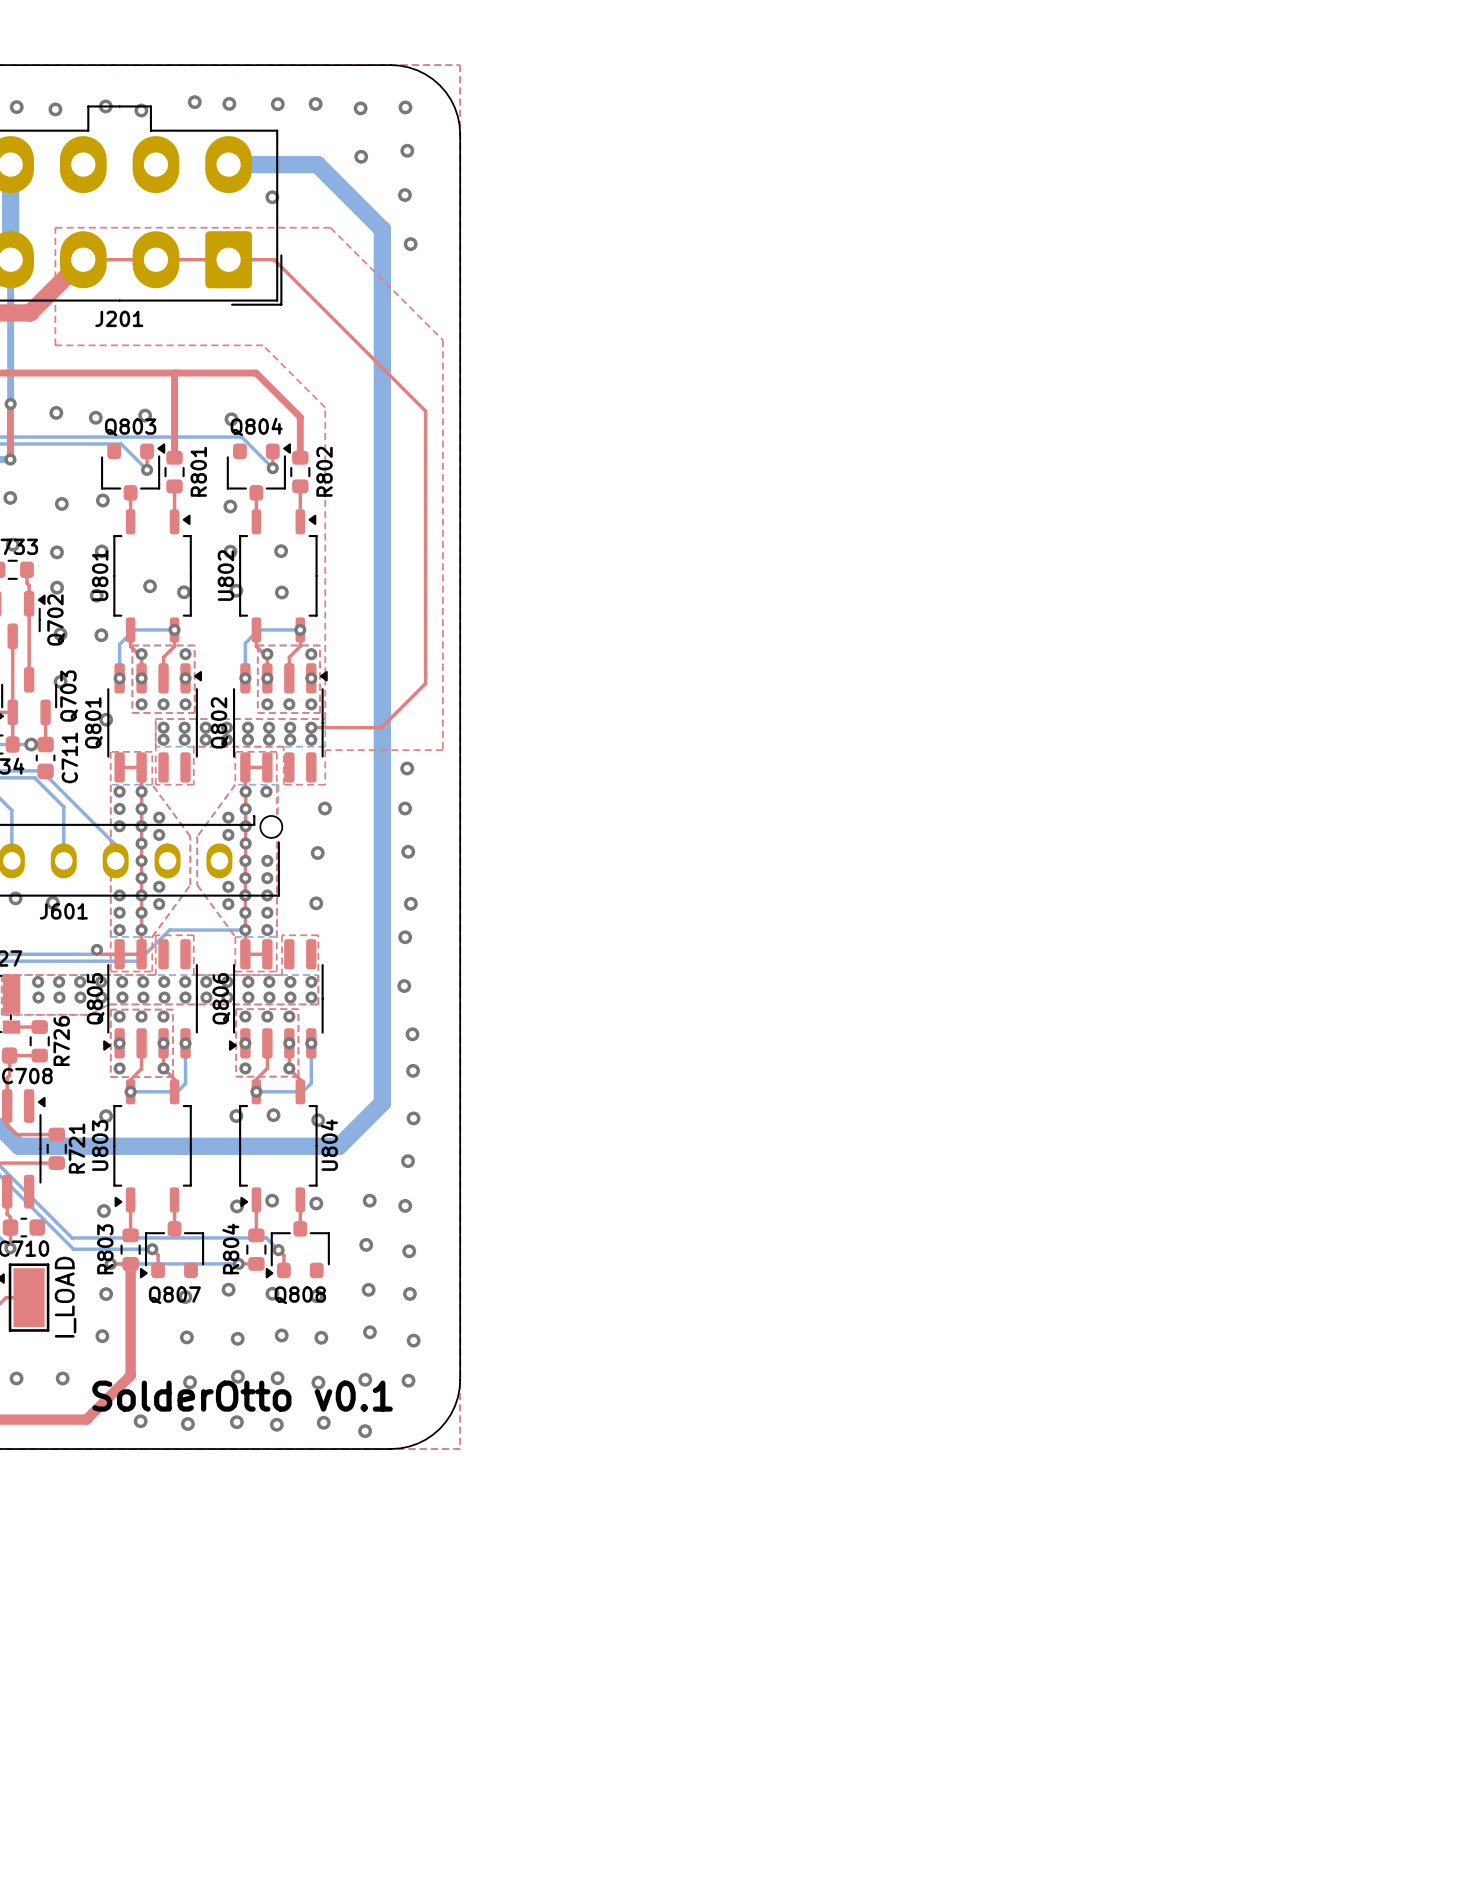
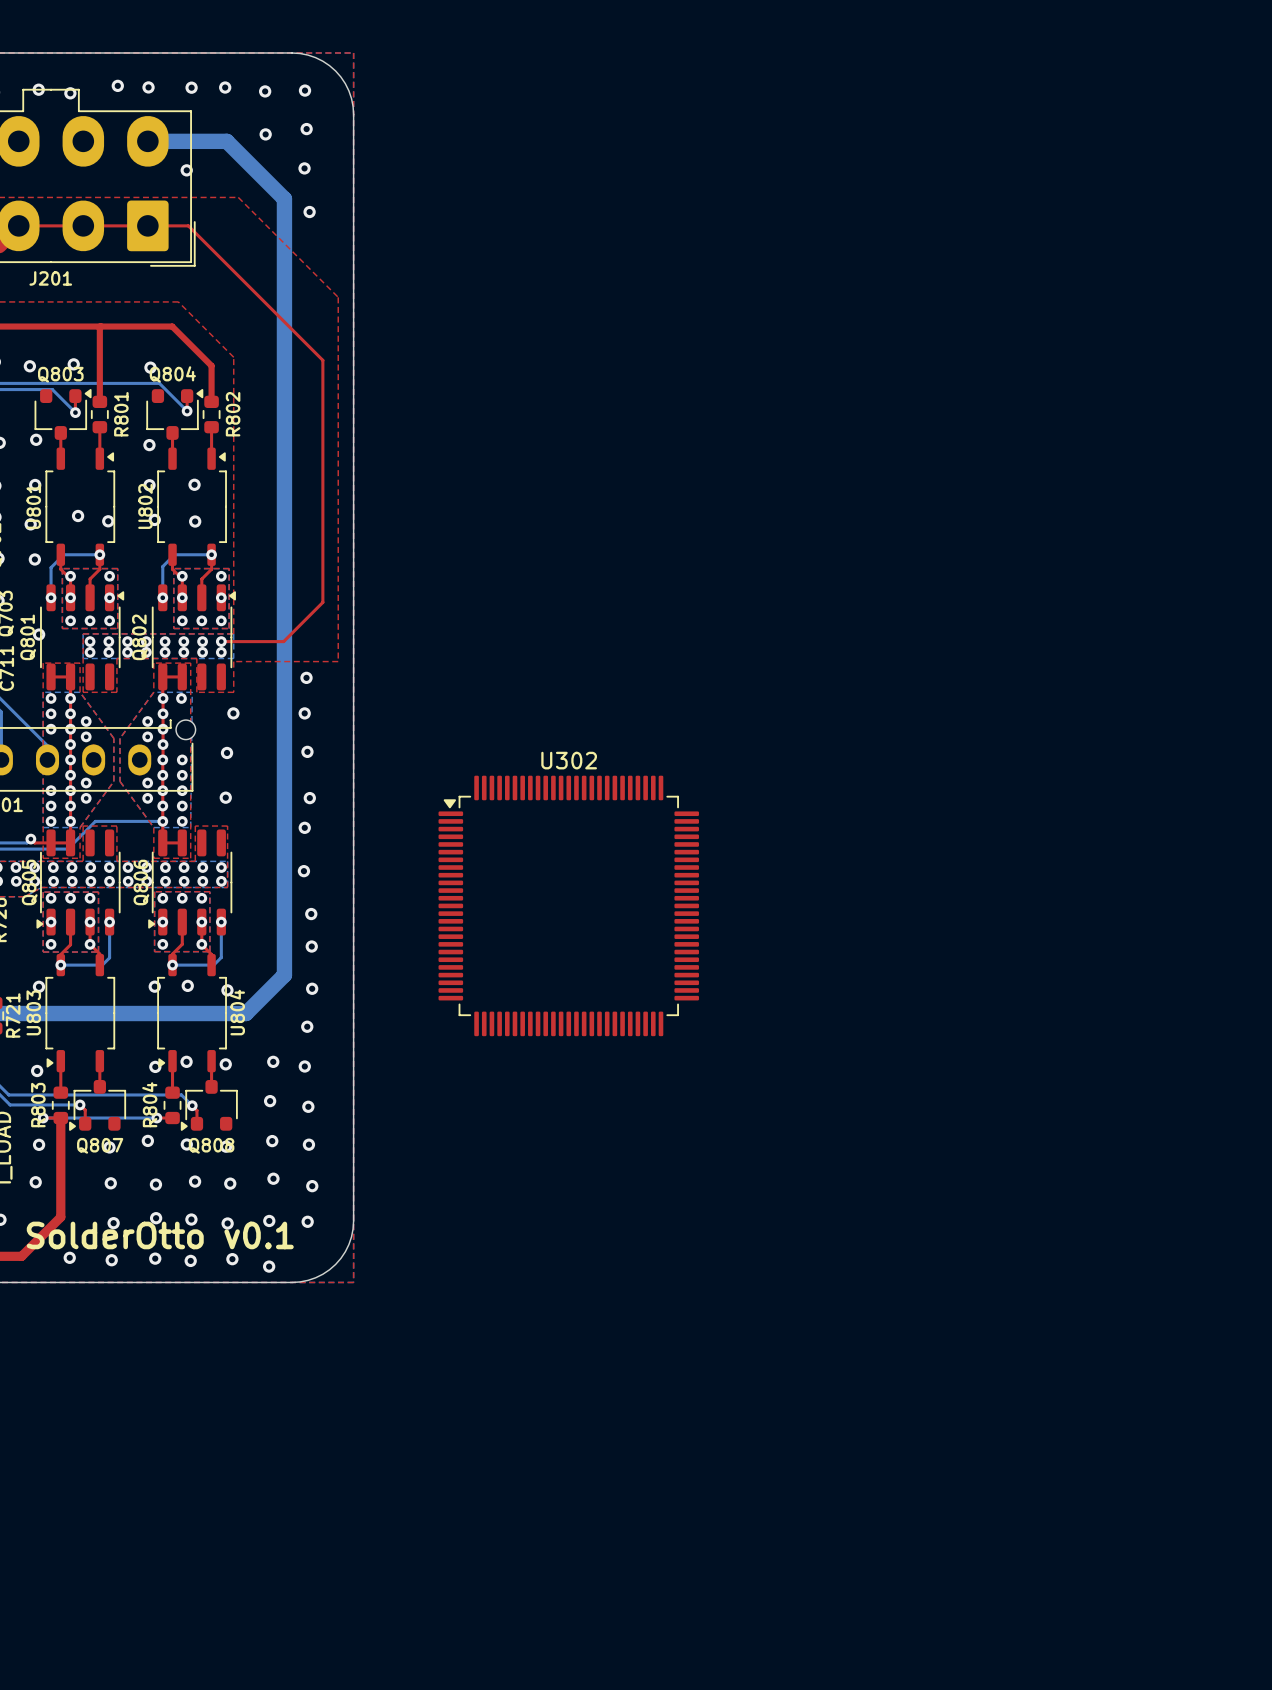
U302: none -> (568, 905)

